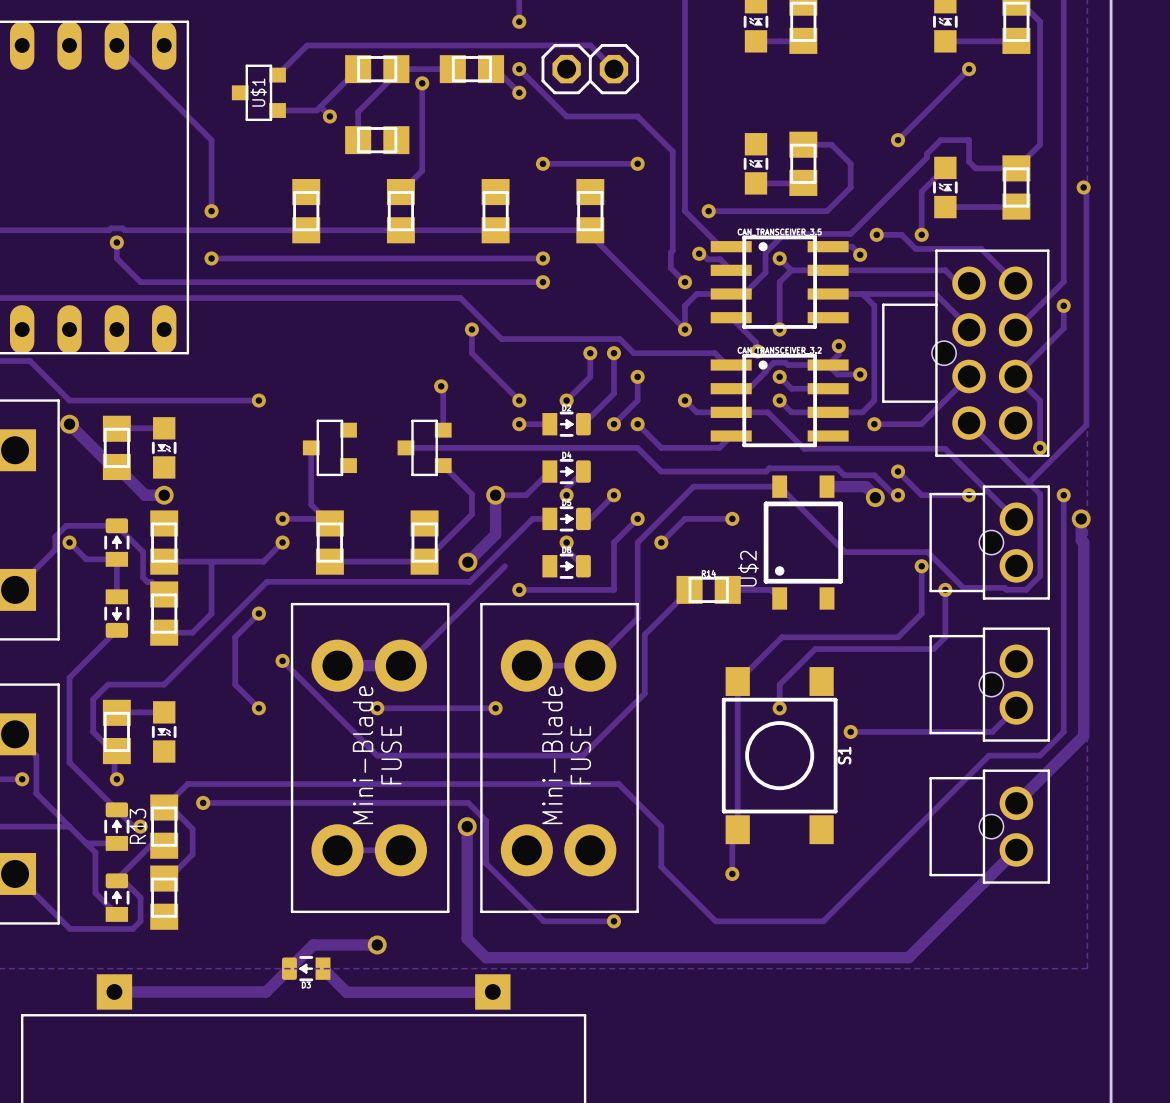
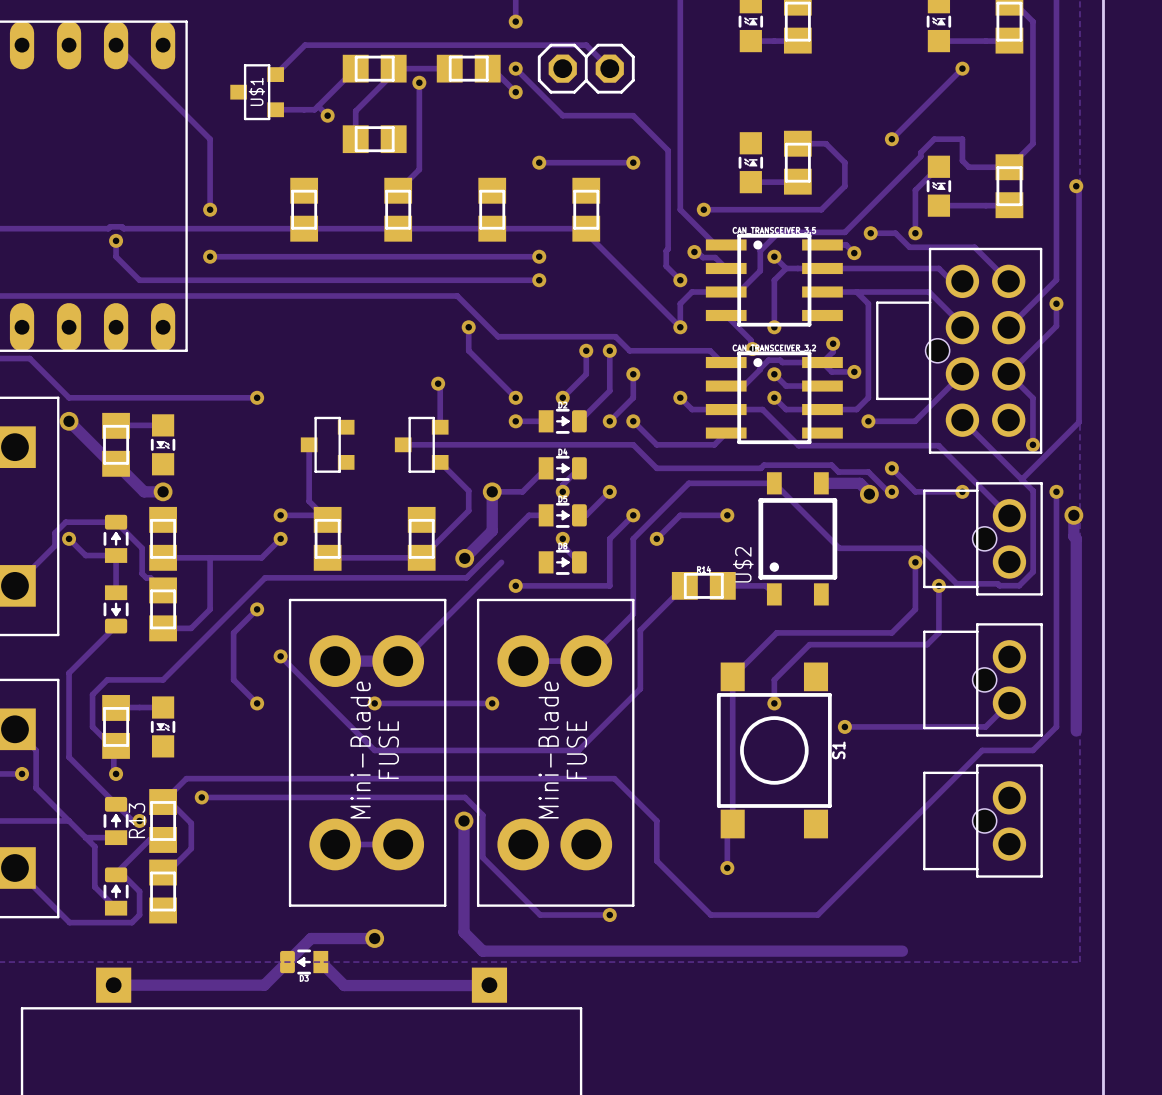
track: (1083, 736) (1016, 803) -> none
track: (1016, 849) (908, 957) -> none

